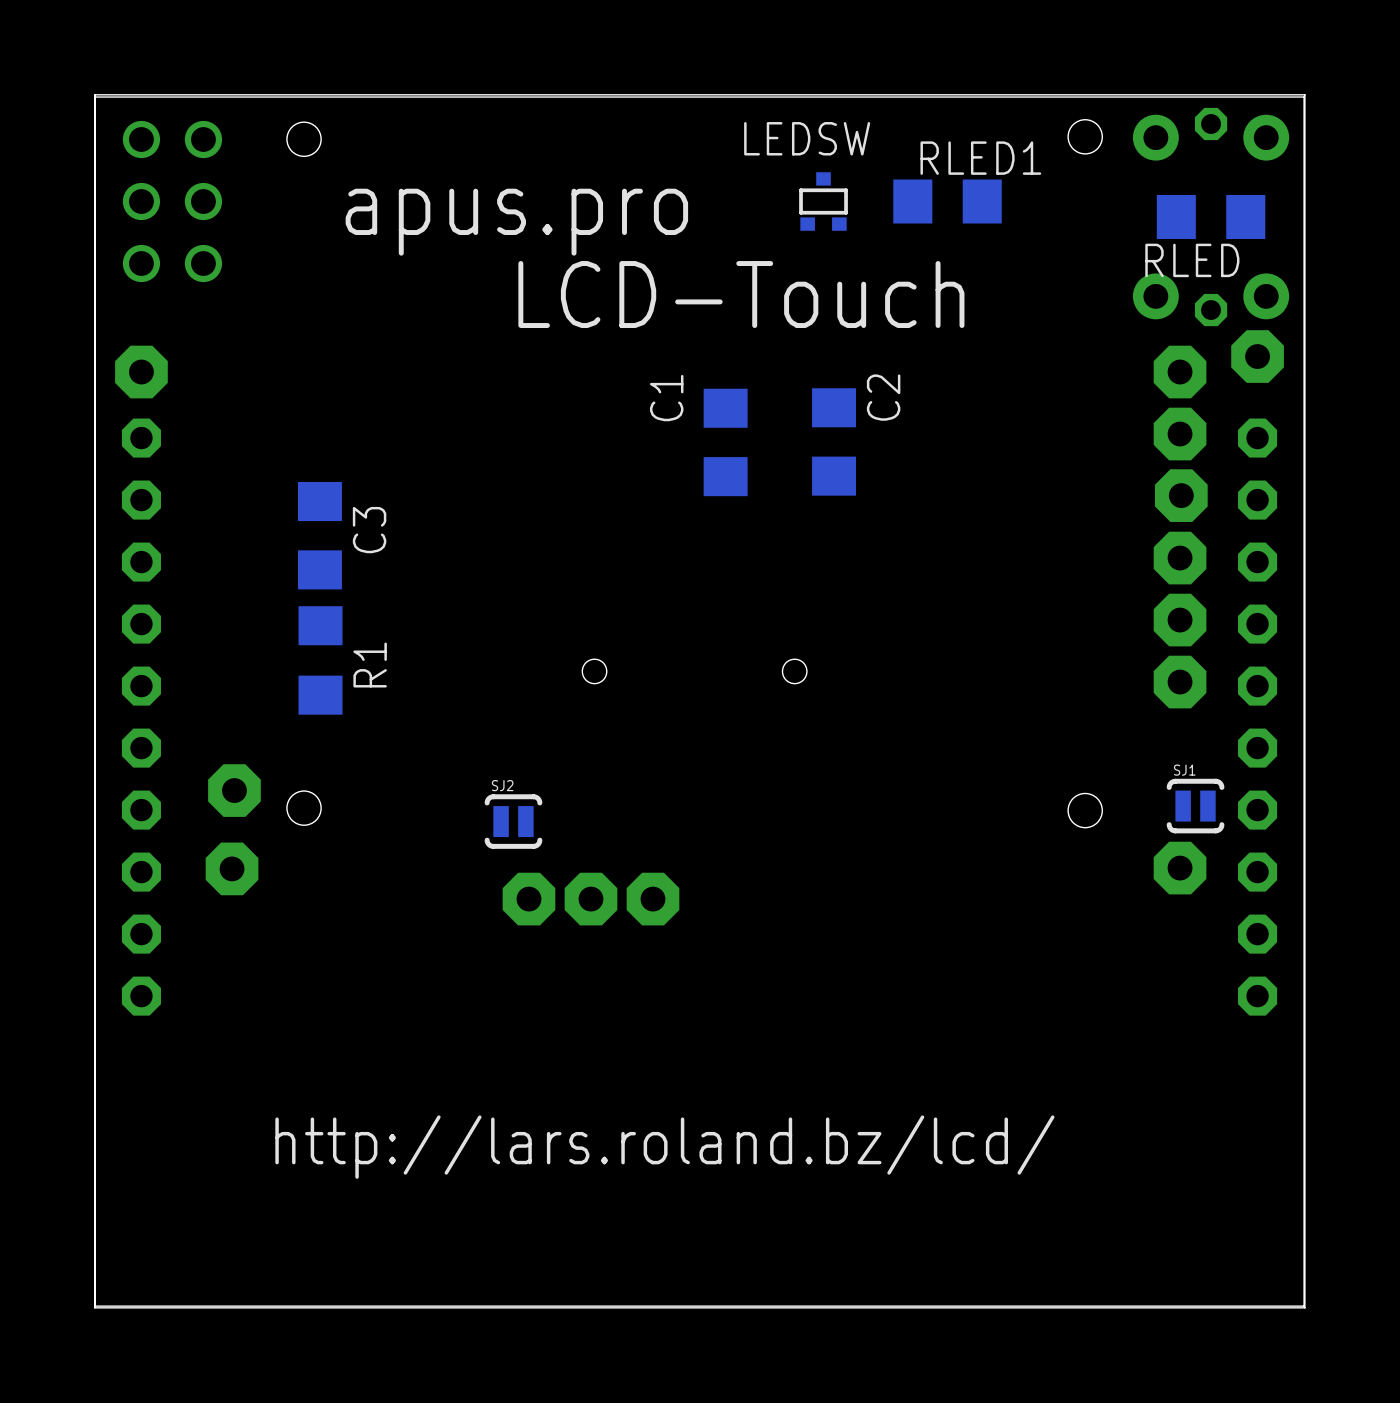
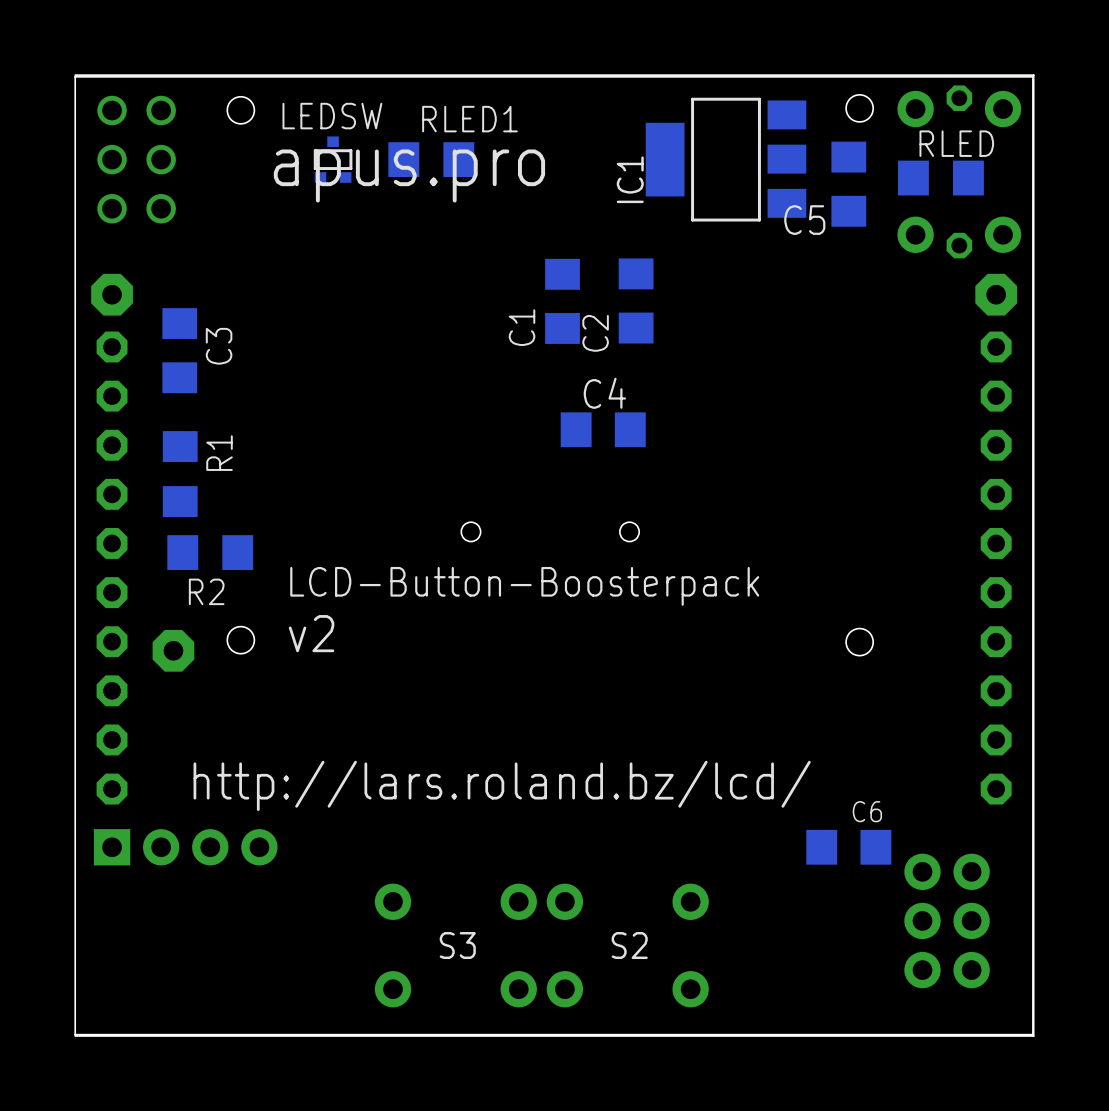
board edge: (94, 94) (94, 1307) -> none
LEDSW name position: LEDSW (807, 138) -> LEDSW (332, 116)
RLED1 name position: RLED1 (980, 158) -> RLED1 (469, 119)
LEDSW position: (823, 201) -> (333, 159)
IC1: none -> (726, 159)
RLED1 position: (947, 201) -> (431, 159)
RLED position: (1211, 217) -> (940, 178)
C5: none -> (848, 184)
RLED name position: RLED (1192, 260) -> RLED (956, 143)
text: LCD-Touch (741, 294) -> none
part position: (1257, 356) -> (996, 294)
part: (1180, 372) -> none
C2 name position: C2 (883, 397) -> C2 (595, 333)
C1 name position: C1 (666, 398) -> C1 (522, 327)
part: (1180, 434) -> none
C2 position: (834, 441) -> (636, 300)
C1 position: (725, 442) -> (562, 301)
part: (1181, 495) -> none
C3 position: (319, 535) -> (179, 350)
C4: none -> (603, 429)
part: (1180, 558) -> none
part: (1180, 620) -> none
R1 position: (320, 660) -> (180, 474)
R1 name position: R1 (370, 665) -> R1 (219, 453)
part: (1180, 682) -> none
R2: none -> (210, 552)
text: none -> LCD-Button-Boosterpack (524, 586)
part: (234, 790) -> none
text: none -> v2 (311, 633)
SJ1: (1195, 806) -> none
part: none -> (173, 650)
SJ2: (513, 821) -> none
part: (232, 868) -> none
part: (1180, 868) -> none
part: (528, 899) -> none
part: (590, 899) -> none
part: (653, 899) -> none
part: none -> (185, 847)
C6: none -> (848, 847)
text position: http://lars.roland.bz/lcd/ (664, 1147) -> http://lars.roland.bz/lcd/ (502, 785)
part: none -> (922, 920)
part: none -> (971, 920)
S3: none -> (455, 945)
S2: none -> (627, 945)

